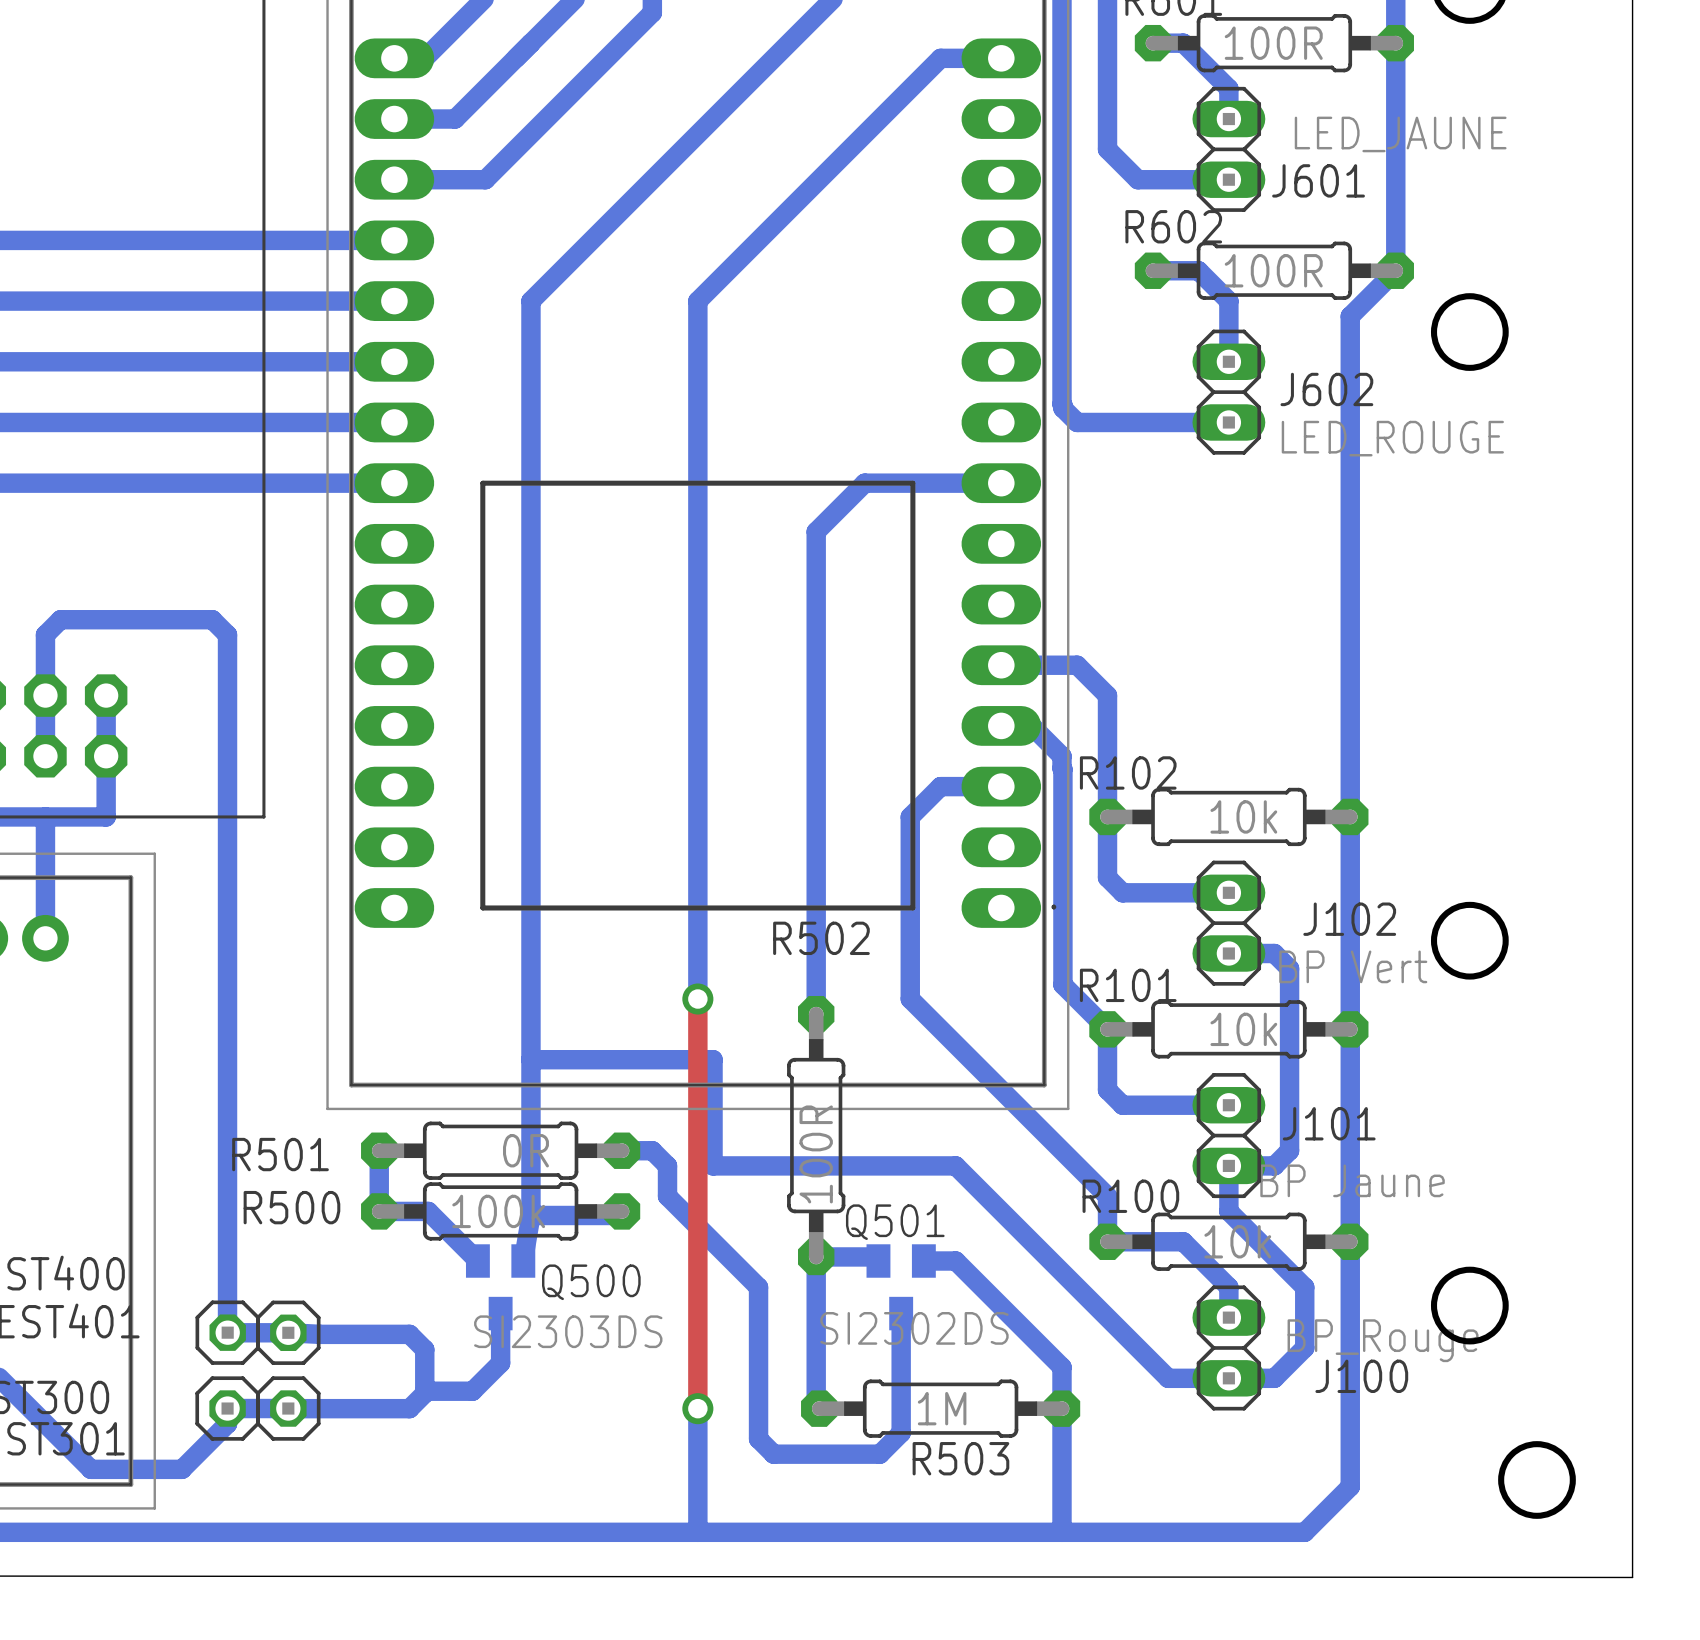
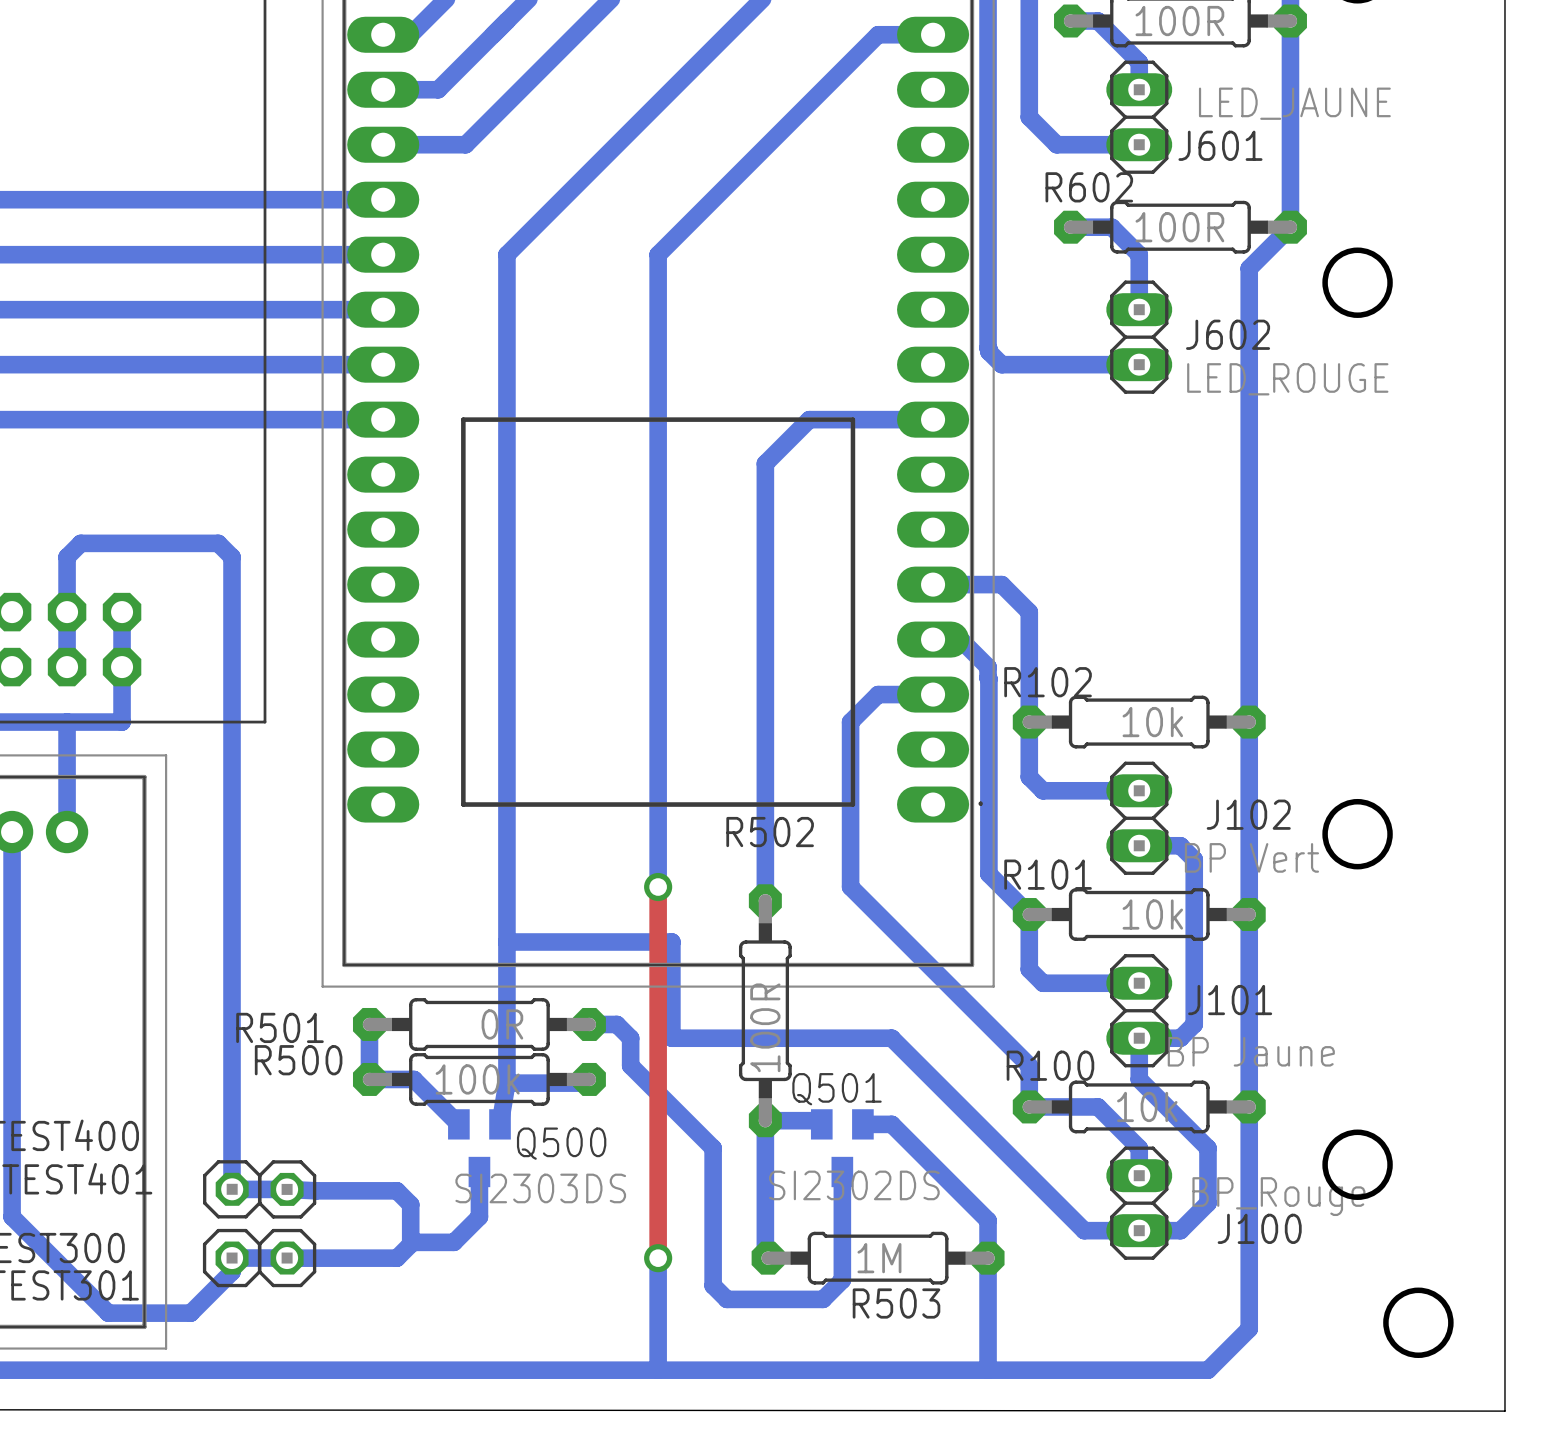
R500 name position: R500 (291, 1207) -> R500 (298, 1060)

